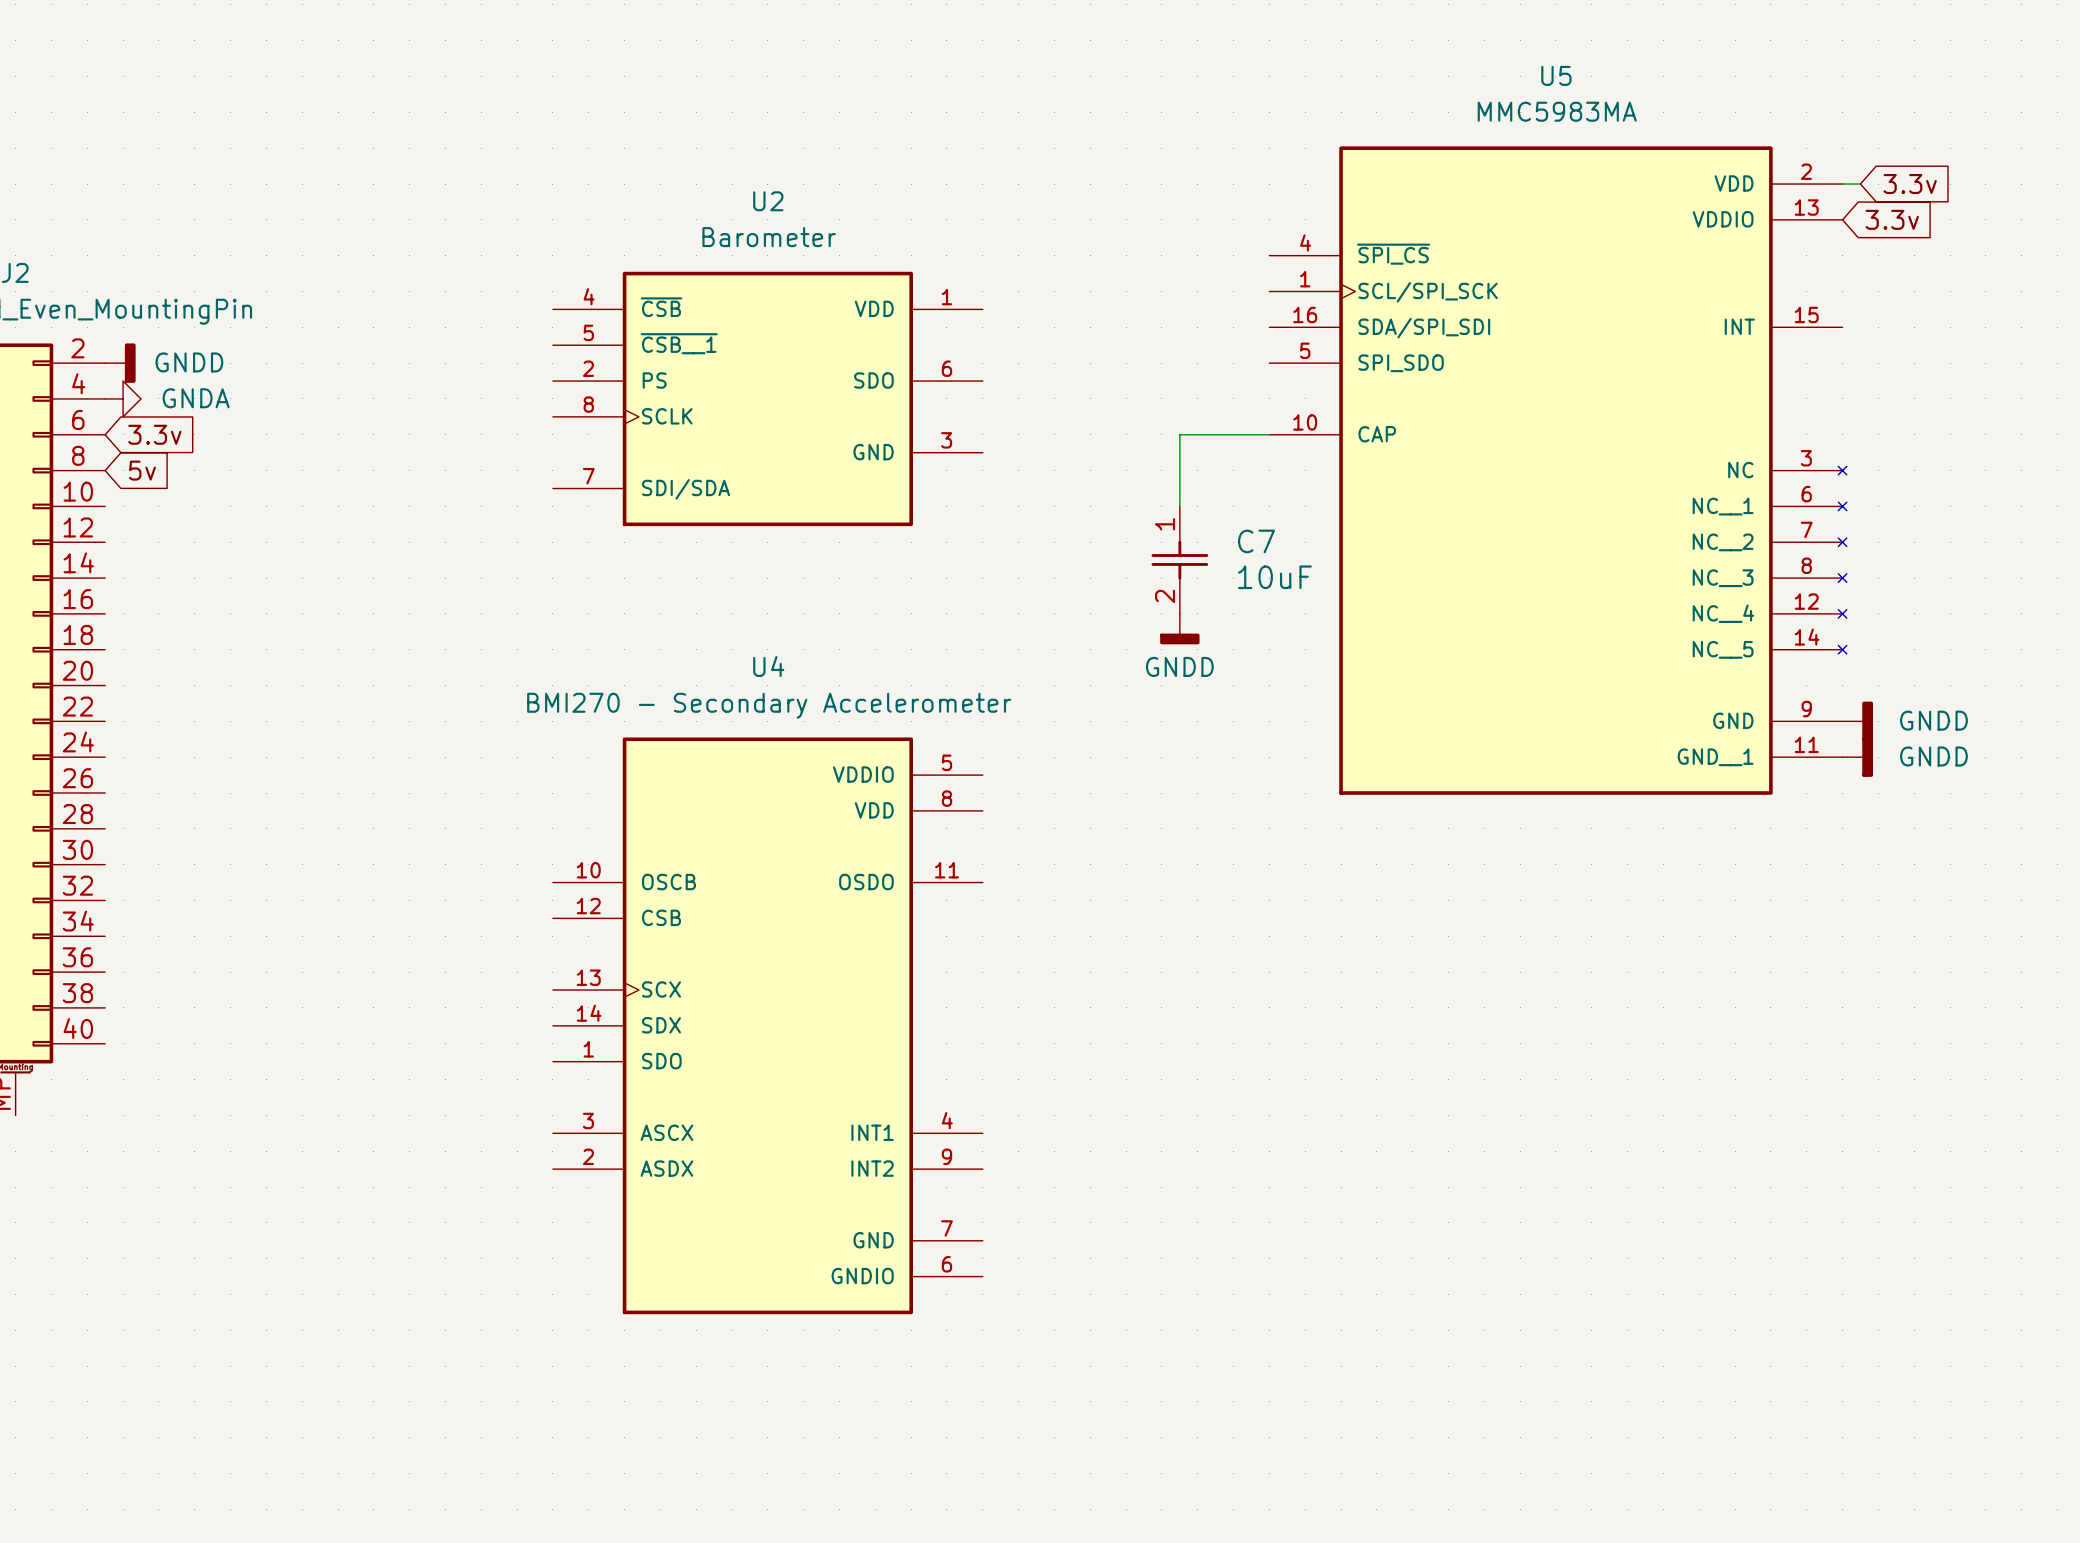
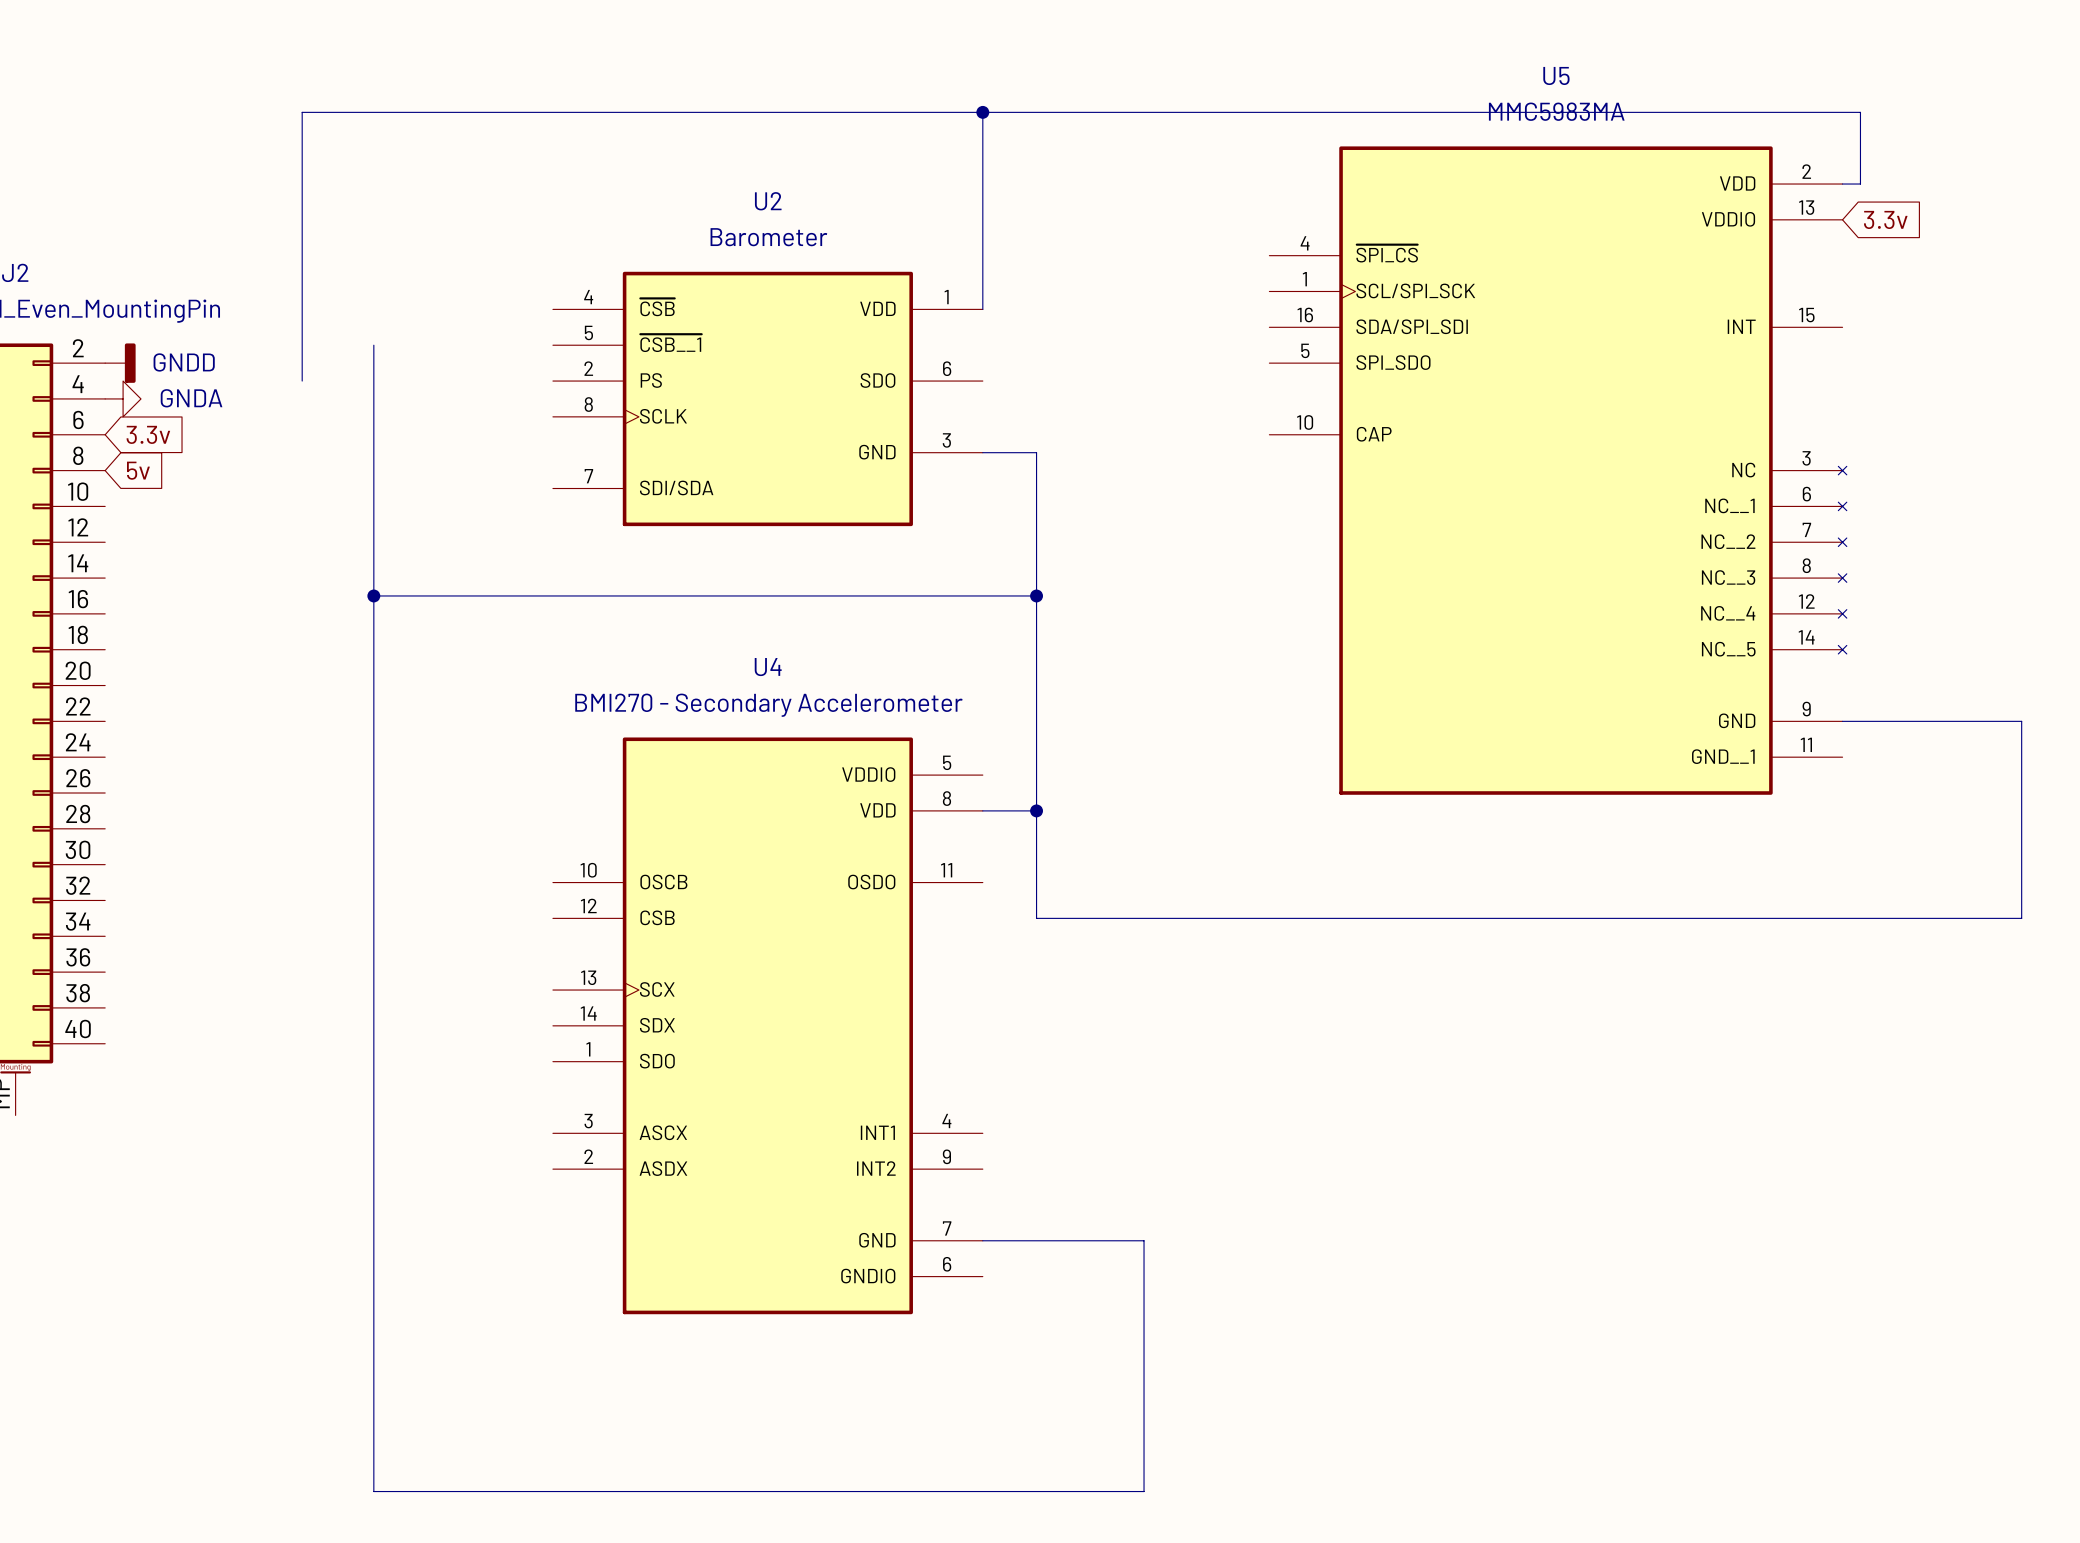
wire: none -> (982, 112) (982, 309)
junction: none -> (982, 112)
wire: none -> (1860, 184) (1860, 112) (302, 112) (302, 381)
global label: 3.3v (1910, 184) -> none
wire: none -> (373, 345) (373, 1491) (1144, 1491) (1144, 1240) (982, 1240)
wire: (1269, 434) (1179, 434) (1179, 506) -> none
wire: none -> (982, 452) (1036, 452) (1036, 918) (2021, 918) (2021, 721) (1842, 721)
C7: 10uF (1179, 560) -> none
wire: none -> (373, 595) (1036, 595)
junction: none -> (373, 595)
junction: none -> (1036, 595)
power symbol: GNDD (1179, 629) -> none
power symbol: GNDD (1857, 721) -> none
power symbol: GNDD (1857, 757) -> none
wire: none -> (982, 810) (1036, 810)
junction: none -> (1036, 810)

